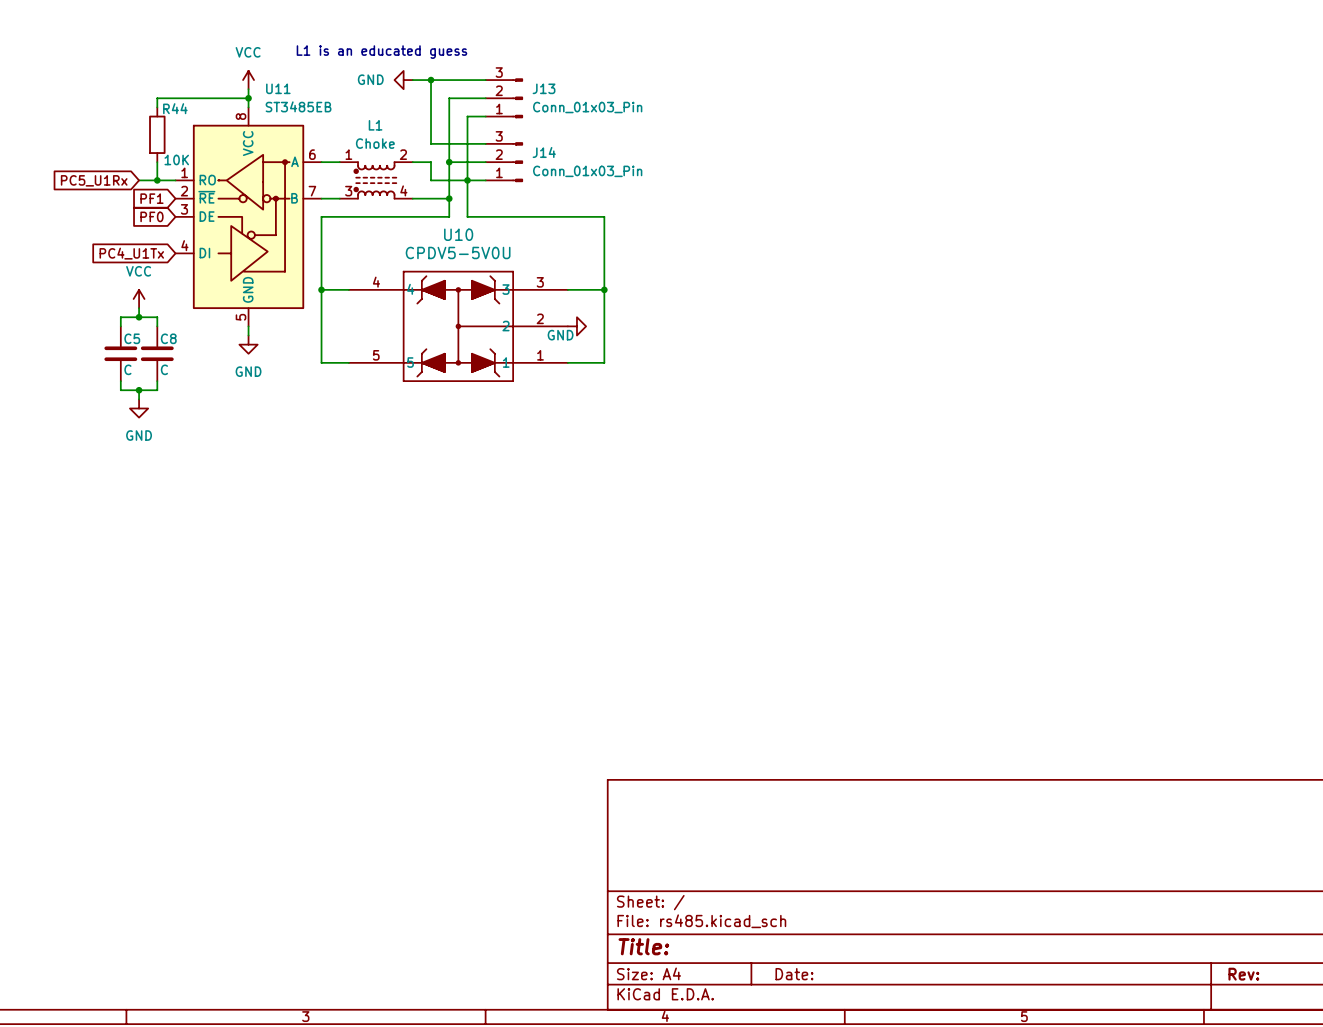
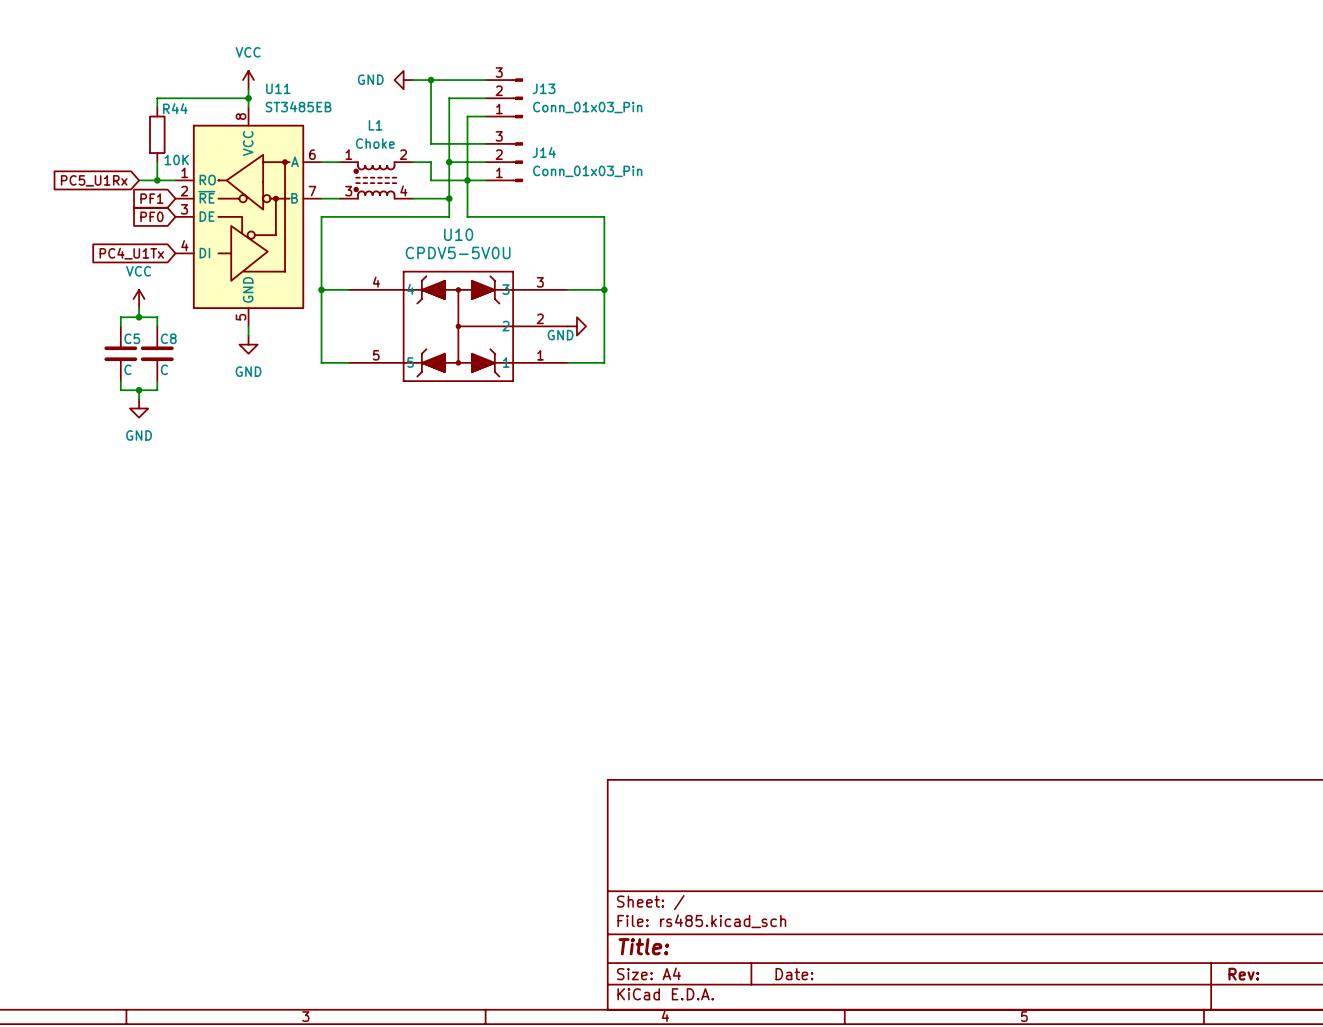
text: L1 is an educated guess (381, 52) -> none

